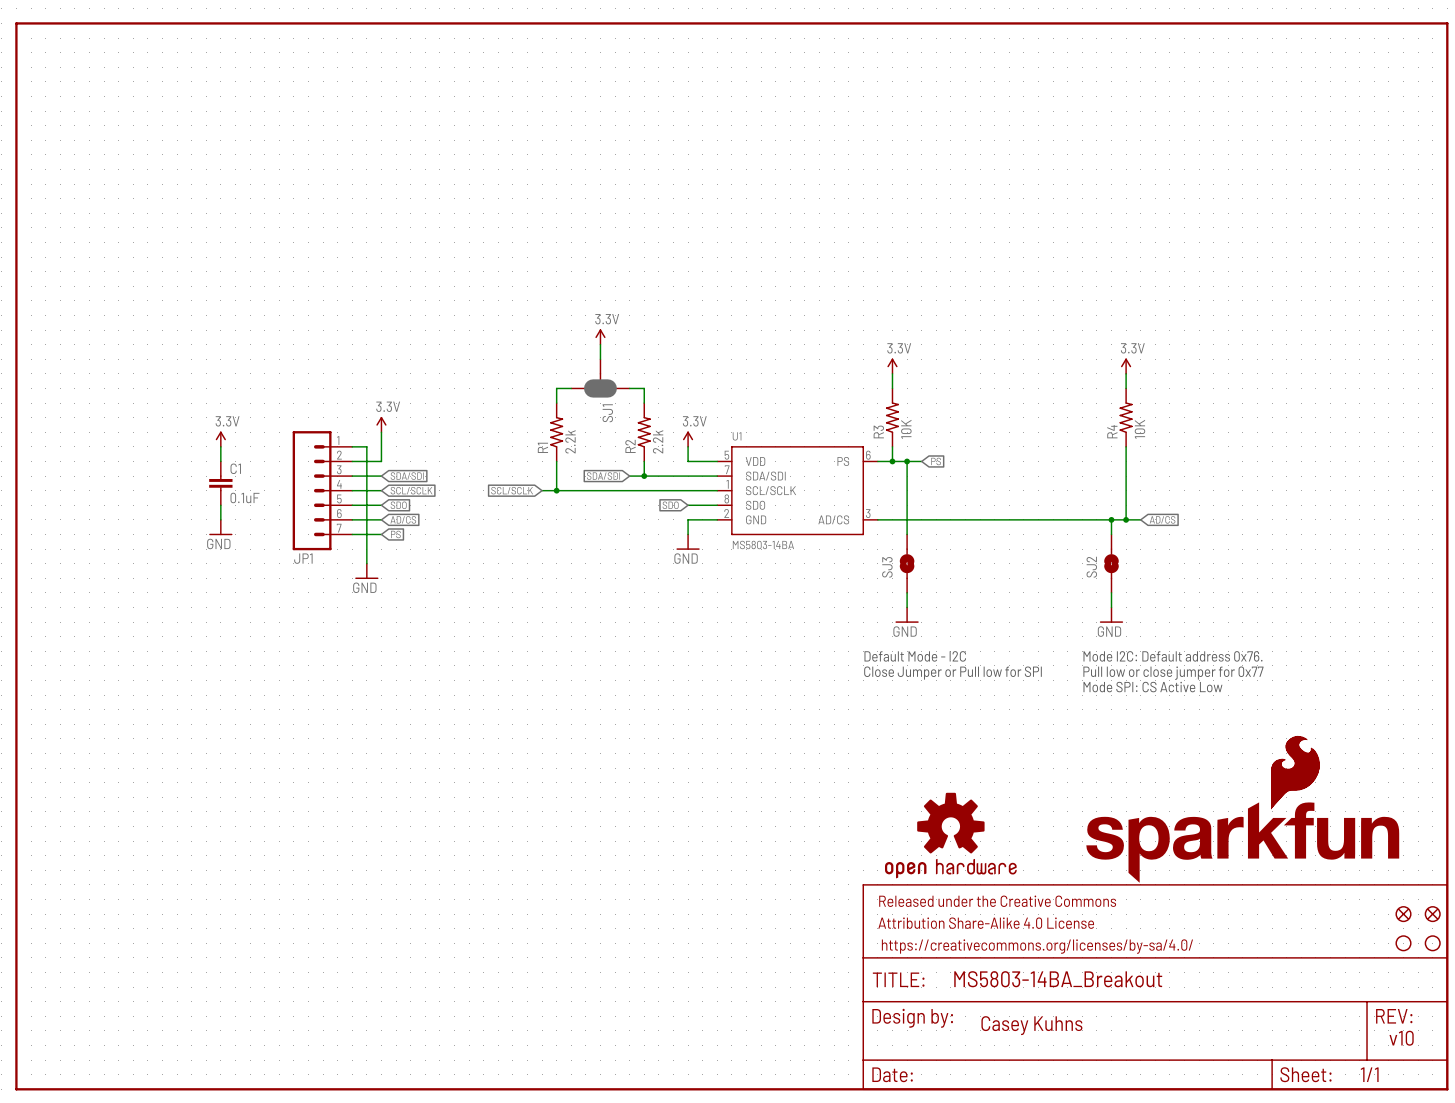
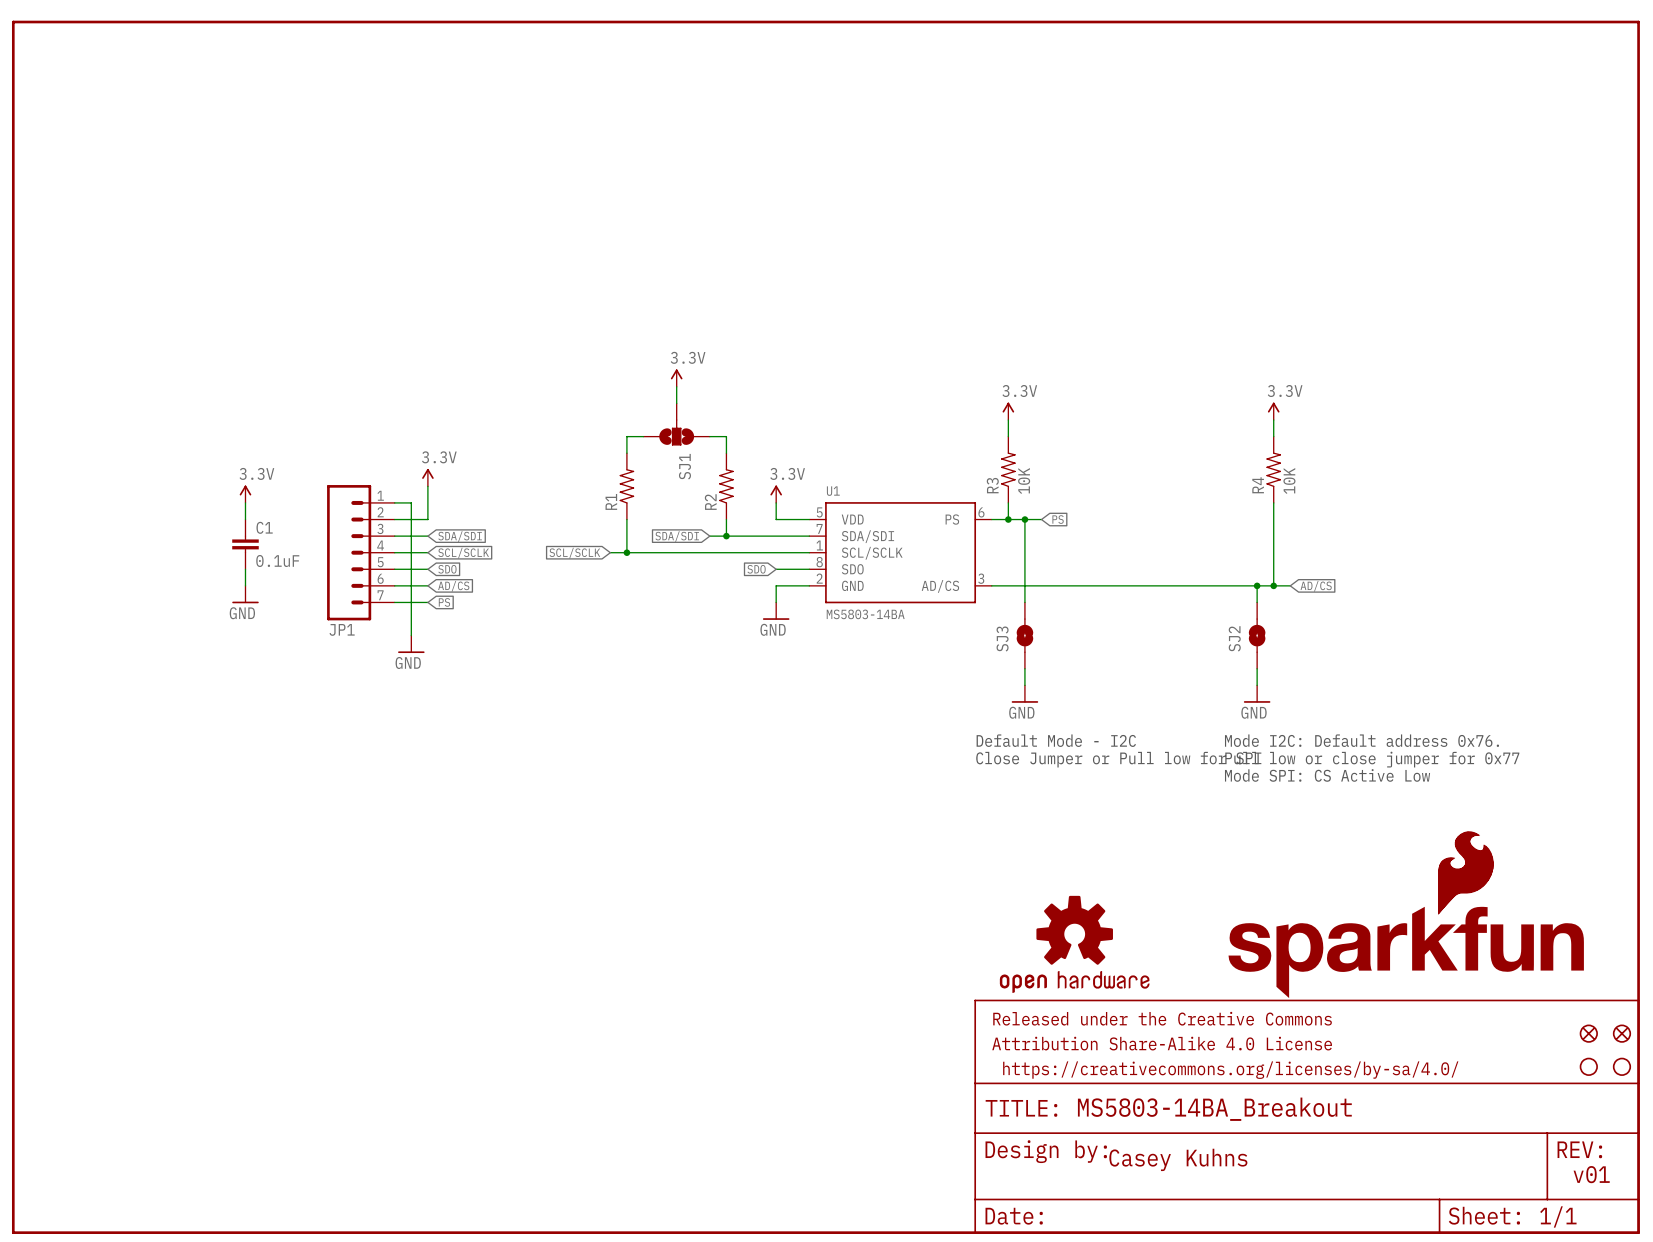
SJ1 symbol: [571, 359, 630, 398] -> [643, 403, 710, 446]
R1 value: 2.2k (570, 441) -> none
R2 value: 2.2k (658, 441) -> none
text: v10 (1401, 1038) -> v01 (1591, 1174)

